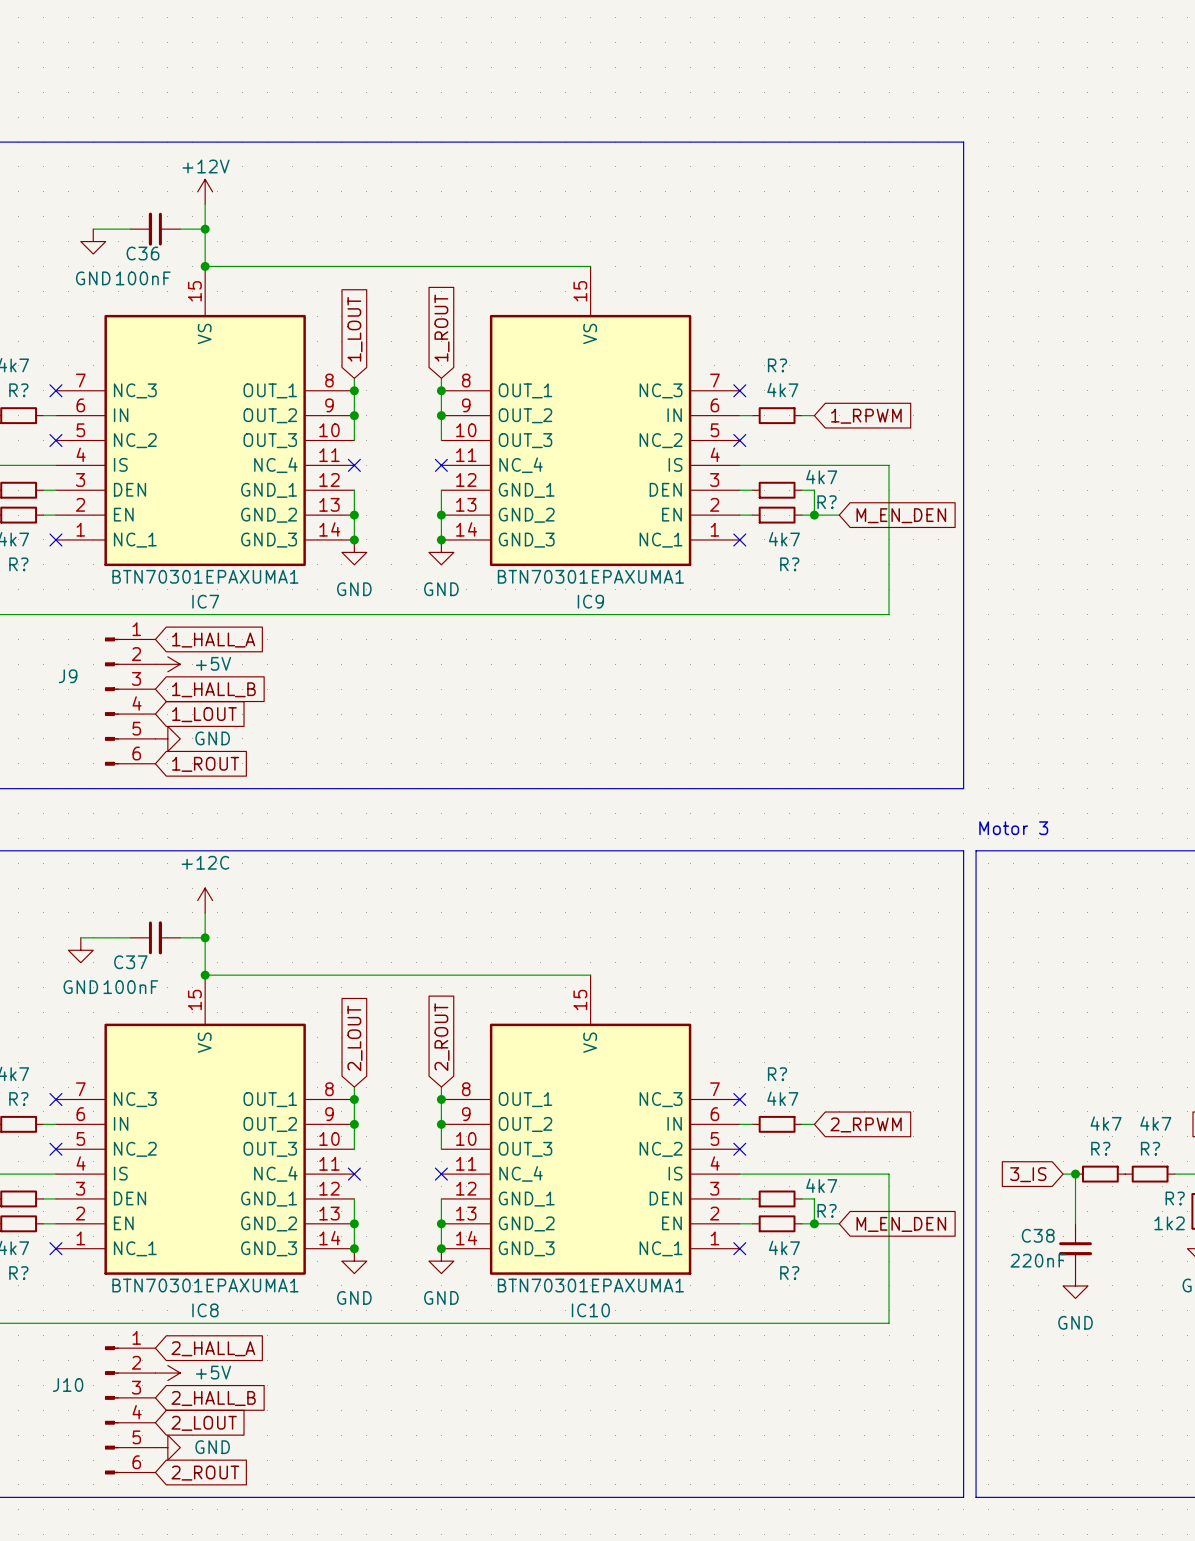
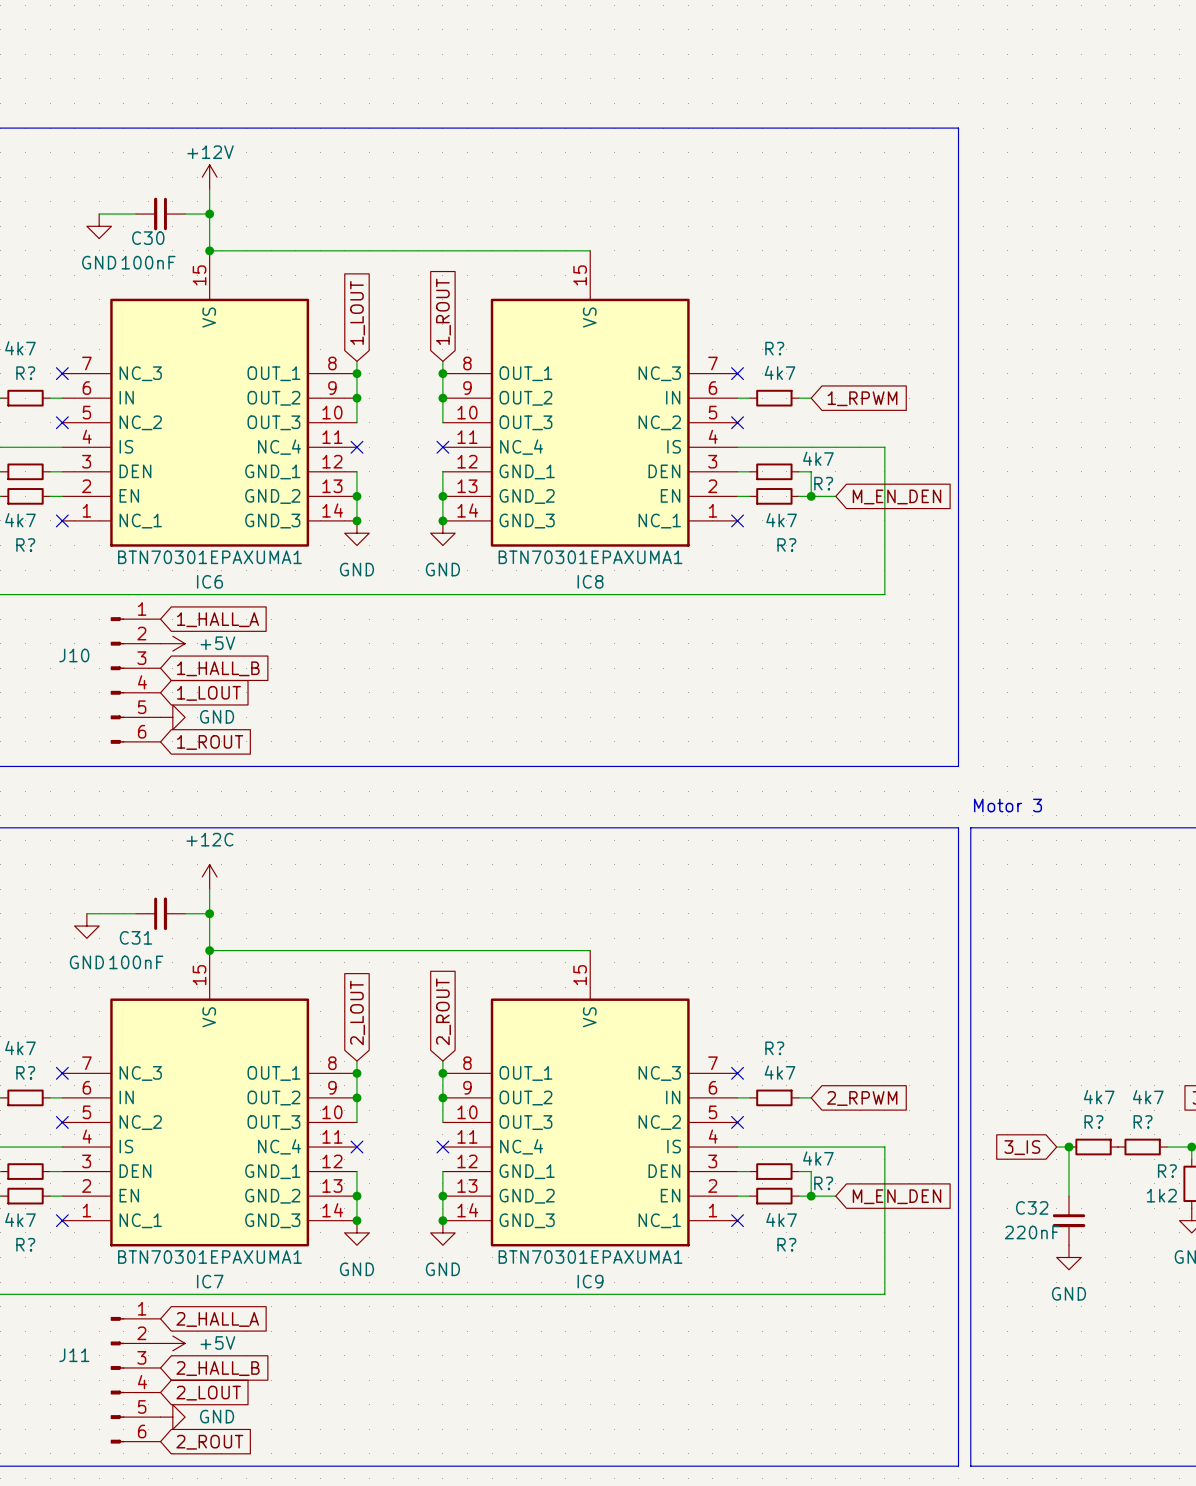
C36 name: C36 (142, 253) -> C30 (148, 238)
IC7 name: IC7 (205, 601) -> IC6 (209, 581)
IC9 name: IC9 (590, 601) -> IC8 (590, 581)
J9 name: J9 (68, 676) -> J10 (74, 655)
C37 name: C37 (130, 962) -> C31 (136, 937)
C38 name: C38 (1038, 1235) -> C32 (1032, 1207)
IC8 name: IC8 (205, 1310) -> IC7 (210, 1281)
IC10 name: IC10 (590, 1310) -> IC9 (590, 1281)
J10 name: J10 (68, 1385) -> J11 (74, 1355)

